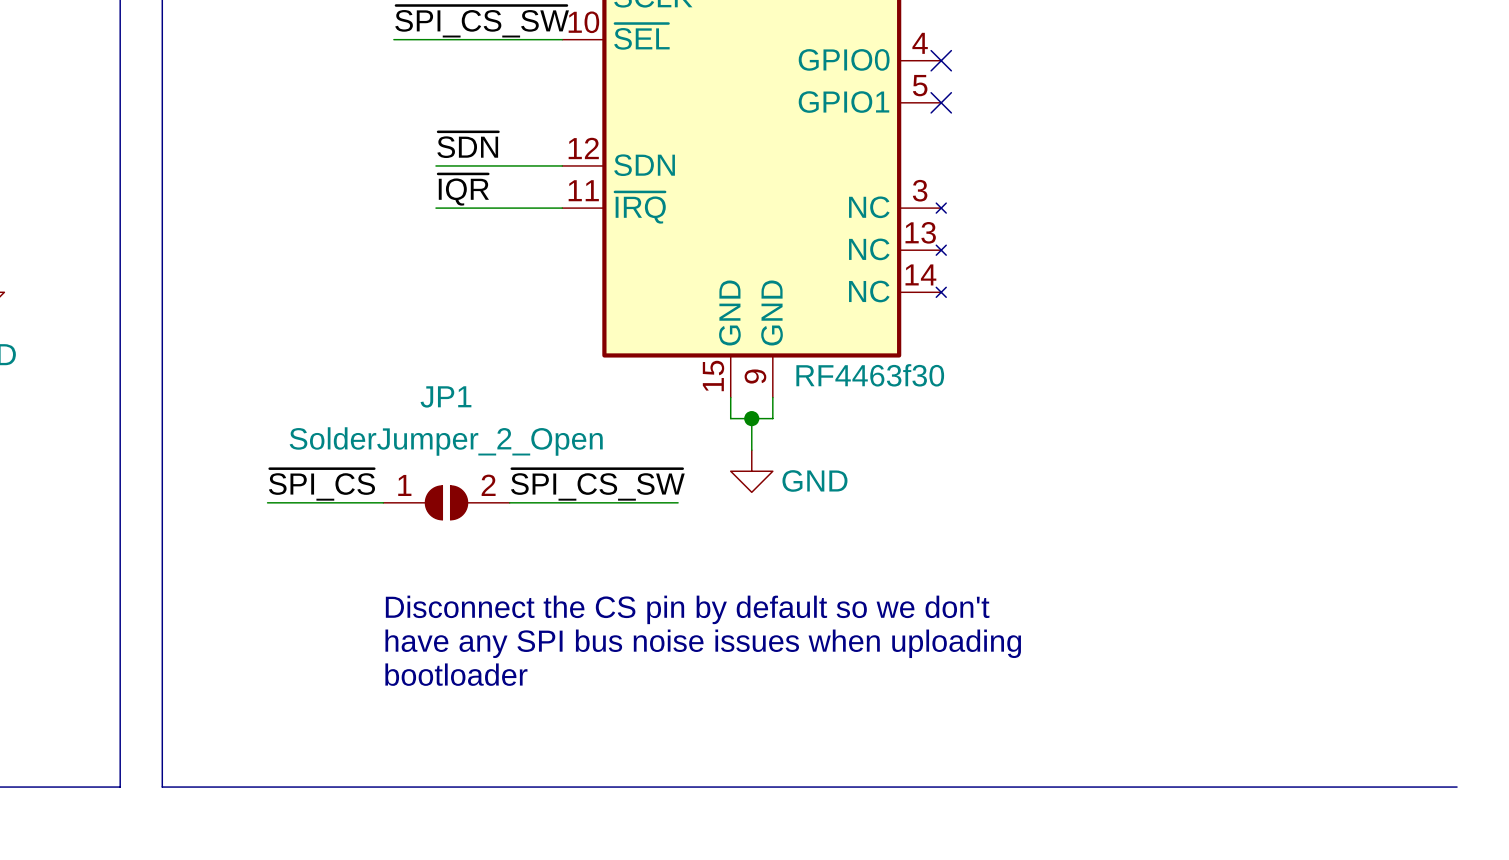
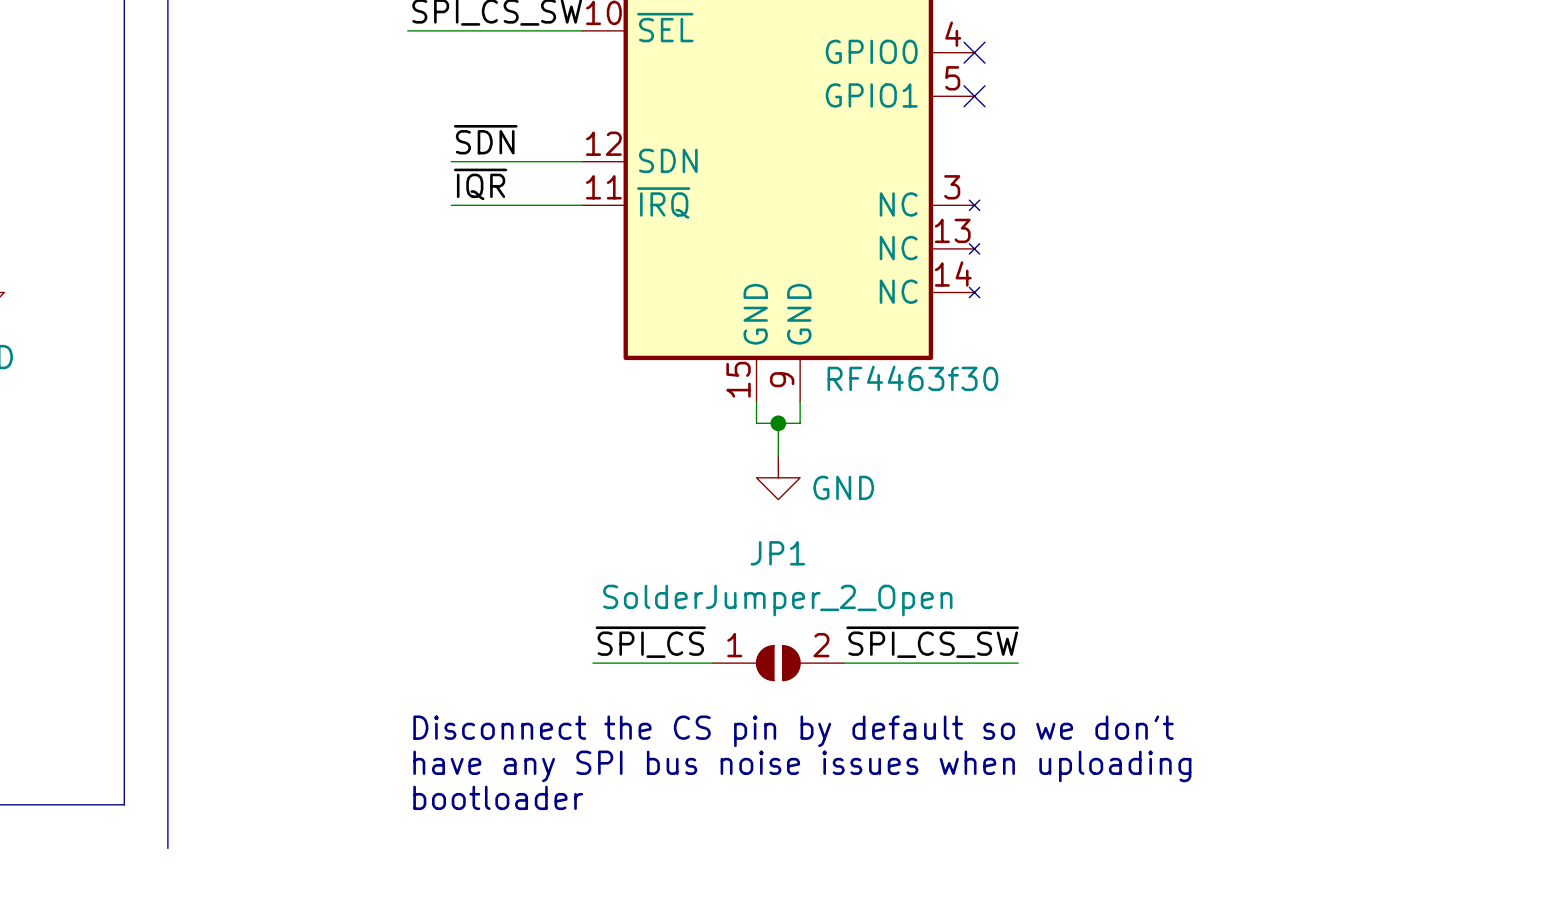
label position: ~{SPI_CS} (321, 484) -> ~{SPI_CS} (650, 642)
label position: ~{SPI_CS_SW} (597, 484) -> ~{SPI_CS_SW} (932, 642)
wire: (267, 502) (383, 502) -> (593, 663) (712, 663)
JP1 position: (446, 502) -> (778, 663)
wire: (509, 502) (678, 502) -> (843, 663) (1018, 663)
text position: Disconnect the CS pin by default so we don't (687, 609) -> Disconnect the CS pin by default so we don't (793, 731)
text position: have any SPI bus noise issues when uploading (703, 643) -> have any SPI bus noise issues when uploading (802, 766)
text position: bootloader (456, 674) -> bootloader (498, 797)
line: (162, 787) (1457, 787) -> (167, 804) (167, 848)

